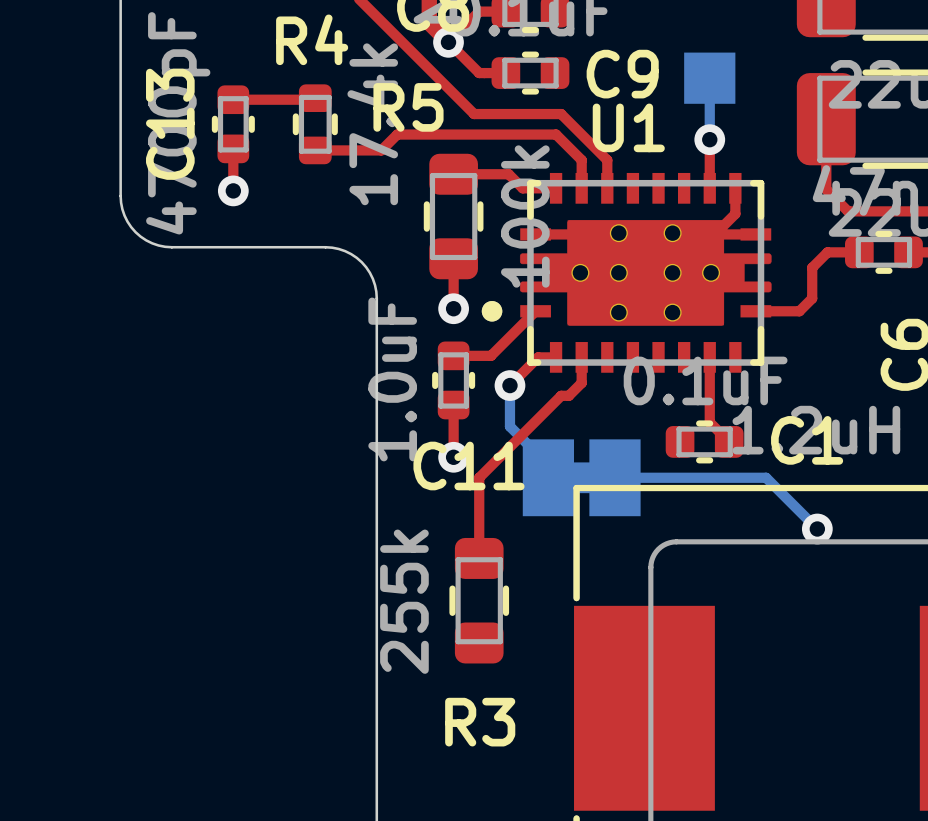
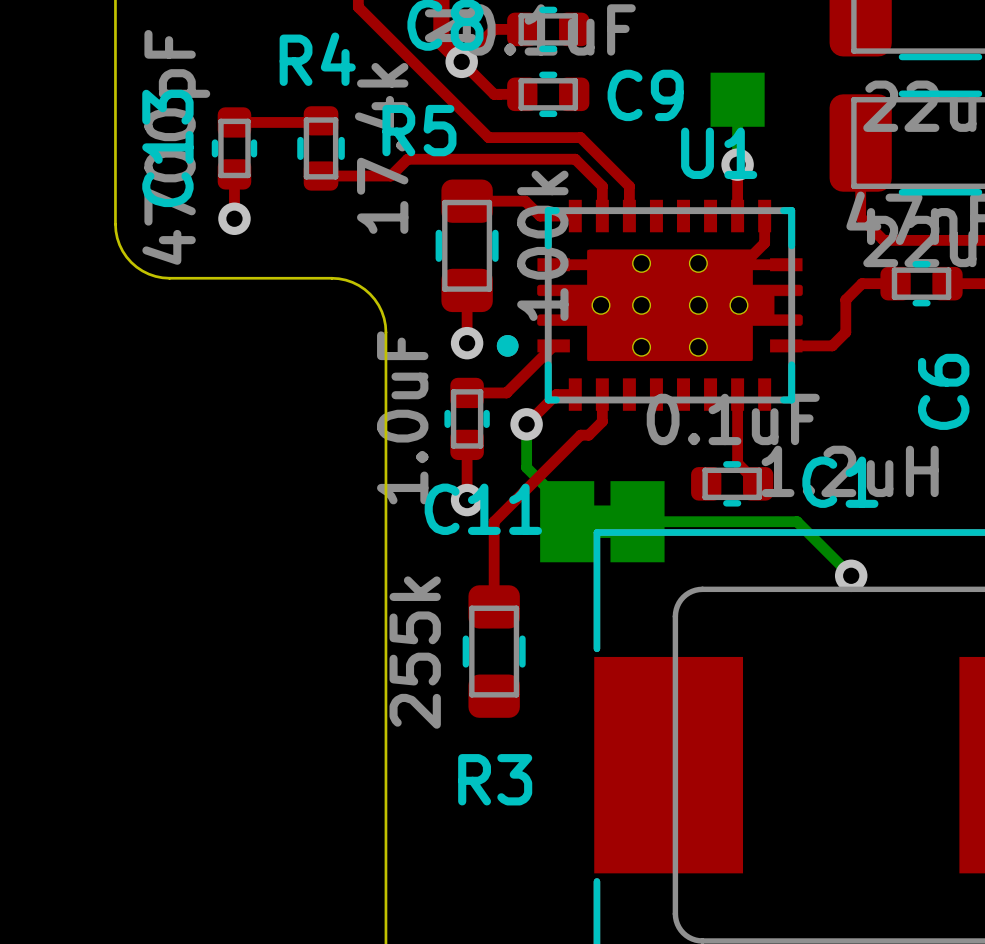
U1 name position: U1 (628, 127) -> U1 (719, 153)

